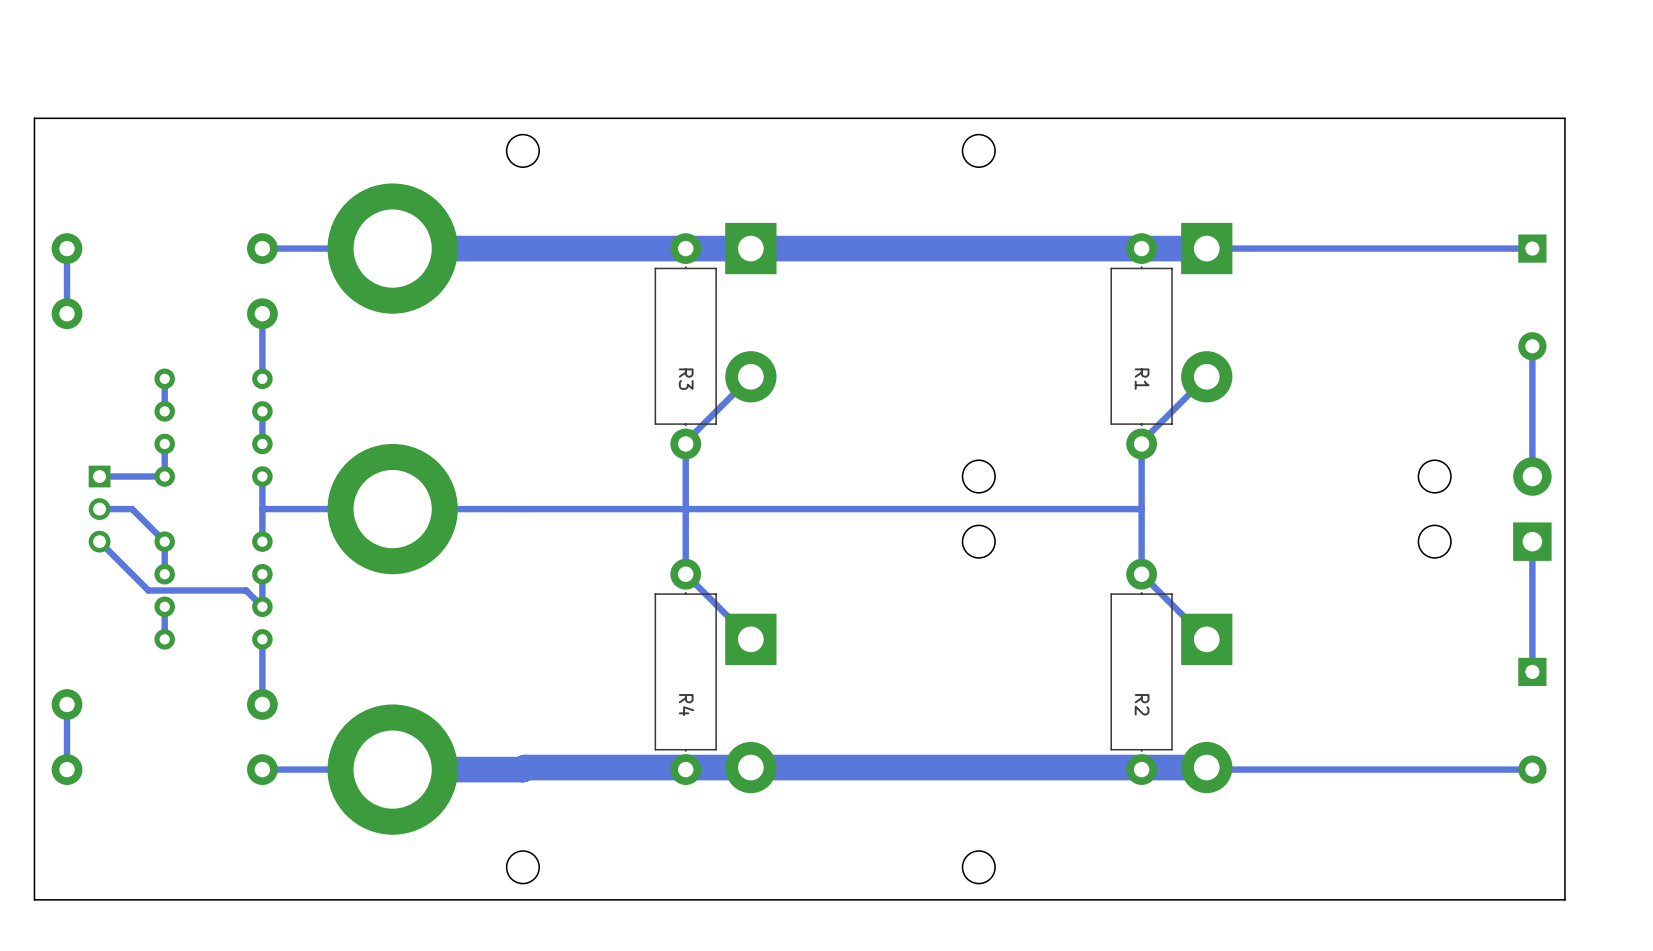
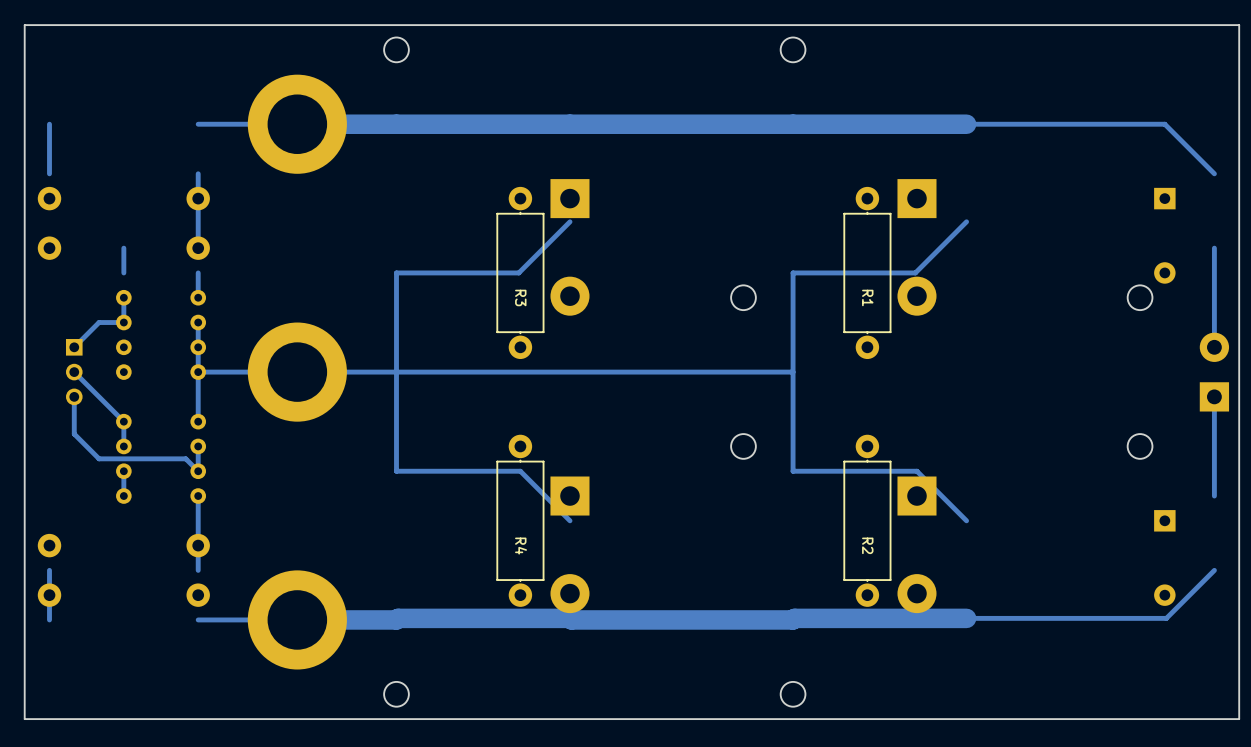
round board edge: none -> [780, 37, 806, 63]
board edge: (34, 118) (1564, 118) (1564, 899) (34, 899) -> (24, 99) (24, 25) (1239, 25) (1239, 719) (24, 719) (24, 694)
round board edge: [962, 134, 996, 168] -> none
track: none -> (198, 124) (1164, 124) (1214, 173)
round board edge position: (522, 150) -> (396, 49)
track: (67, 248) (67, 313) -> (49, 124) (49, 173)
part position: (392, 248) -> (297, 124)
track: (1532, 248) (262, 248) -> none
track: none -> (569, 221) (518, 272) (396, 272) (396, 471) (520, 471) (569, 520)
track: none -> (966, 221) (915, 272) (793, 272) (793, 471) (916, 471) (966, 520)
track: none -> (123, 248) (123, 272)
track: (262, 313) (262, 346) -> (198, 248) (198, 173)
track: (1532, 346) (1532, 476) -> (1214, 248) (1214, 347)
round board edge: none -> [730, 285, 757, 311]
round board edge: none -> [1127, 285, 1153, 311]
track: (750, 376) (683, 443) -> none
track: (1206, 376) (1139, 443) -> none
track: none -> (123, 322) (99, 322) (74, 347)
track: (164, 443) (164, 476) (99, 476) -> none
track: none -> (198, 347) (198, 372) (793, 372)
track: (685, 443) (685, 574) (750, 639) -> none
track: (1141, 443) (1141, 574) (1206, 639) -> none
round board edge: [962, 459, 996, 494] -> none
round board edge: [1418, 459, 1452, 494] -> none
part position: (99, 509) -> (74, 372)
track: (132, 509) (99, 509) -> (99, 396) (74, 372)
part position: (392, 509) -> (297, 372)
track: (1141, 509) (262, 509) -> none
part position: (1532, 509) -> (1214, 372)
round board edge: [1418, 525, 1452, 559] -> none
track: (99, 541) (148, 590) -> (74, 396) (74, 434) (99, 458) (111, 458)
round board edge position: (978, 541) -> (743, 446)
track: (1532, 541) (1532, 671) -> (1214, 396) (1214, 496)
round board edge: none -> [1127, 433, 1153, 460]
track: (67, 704) (67, 737) -> (49, 595) (49, 619)
track: none -> (198, 545) (198, 570)
track: none -> (1214, 570) (1166, 618) (198, 619)
track: (1206, 767) (262, 769) -> none
part position: (392, 769) -> (297, 619)
track: (1532, 769) (1208, 769) -> none
round board edge position: (522, 867) -> (396, 694)
round board edge position: (978, 867) -> (793, 694)

